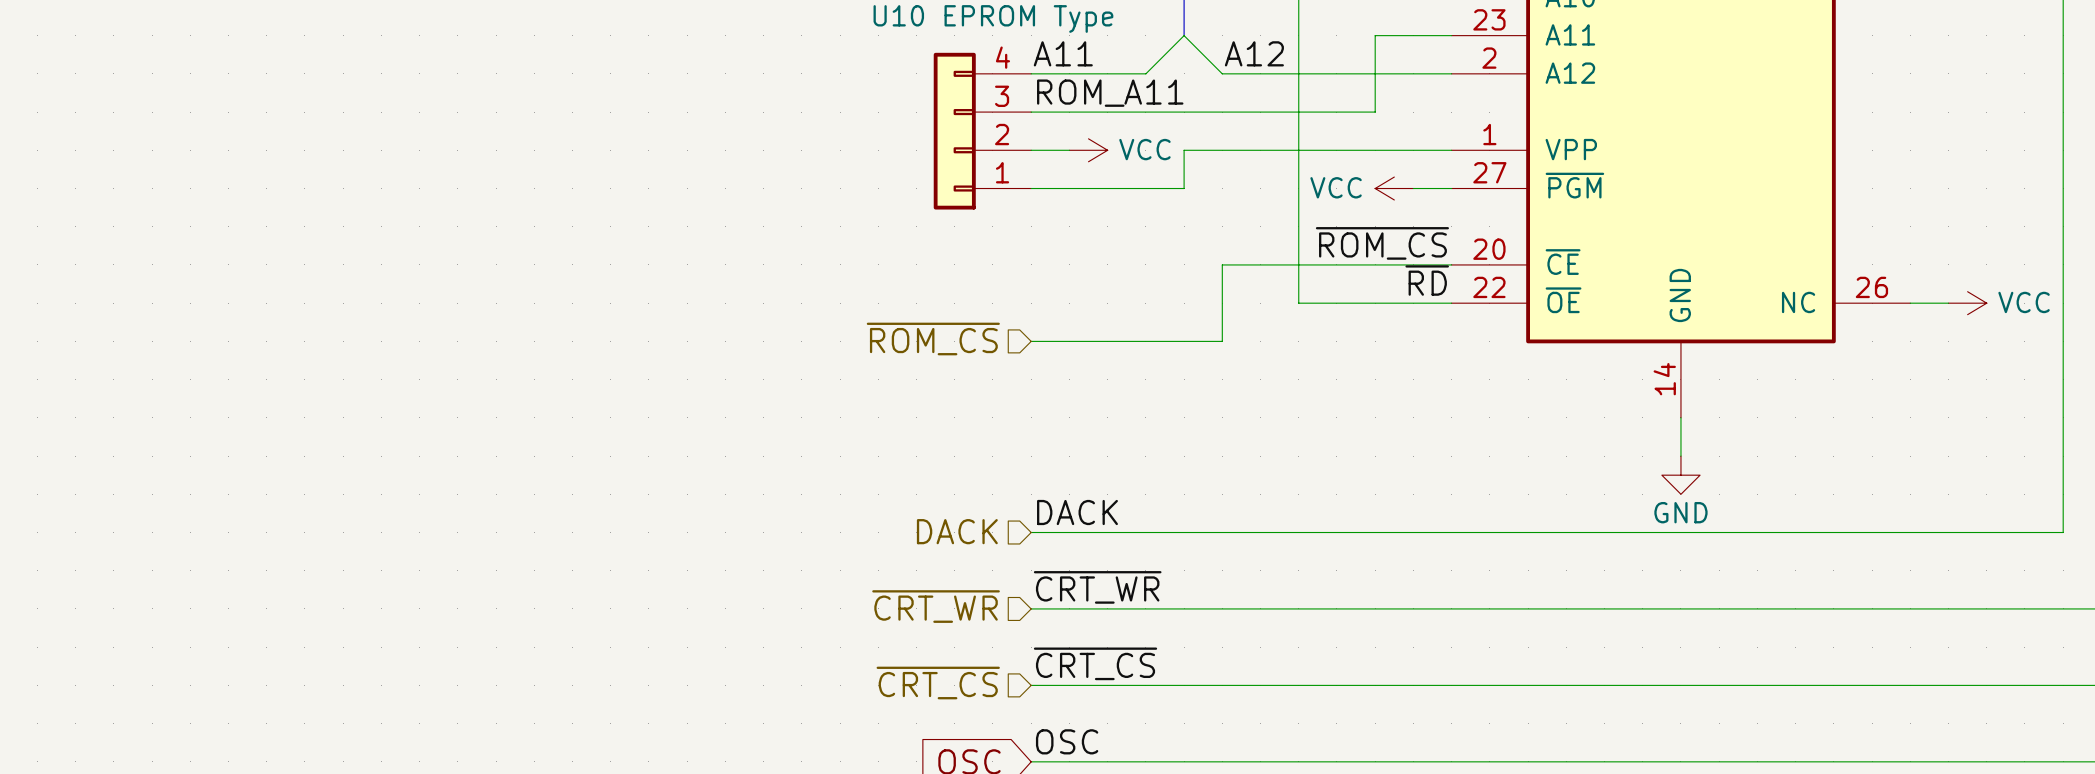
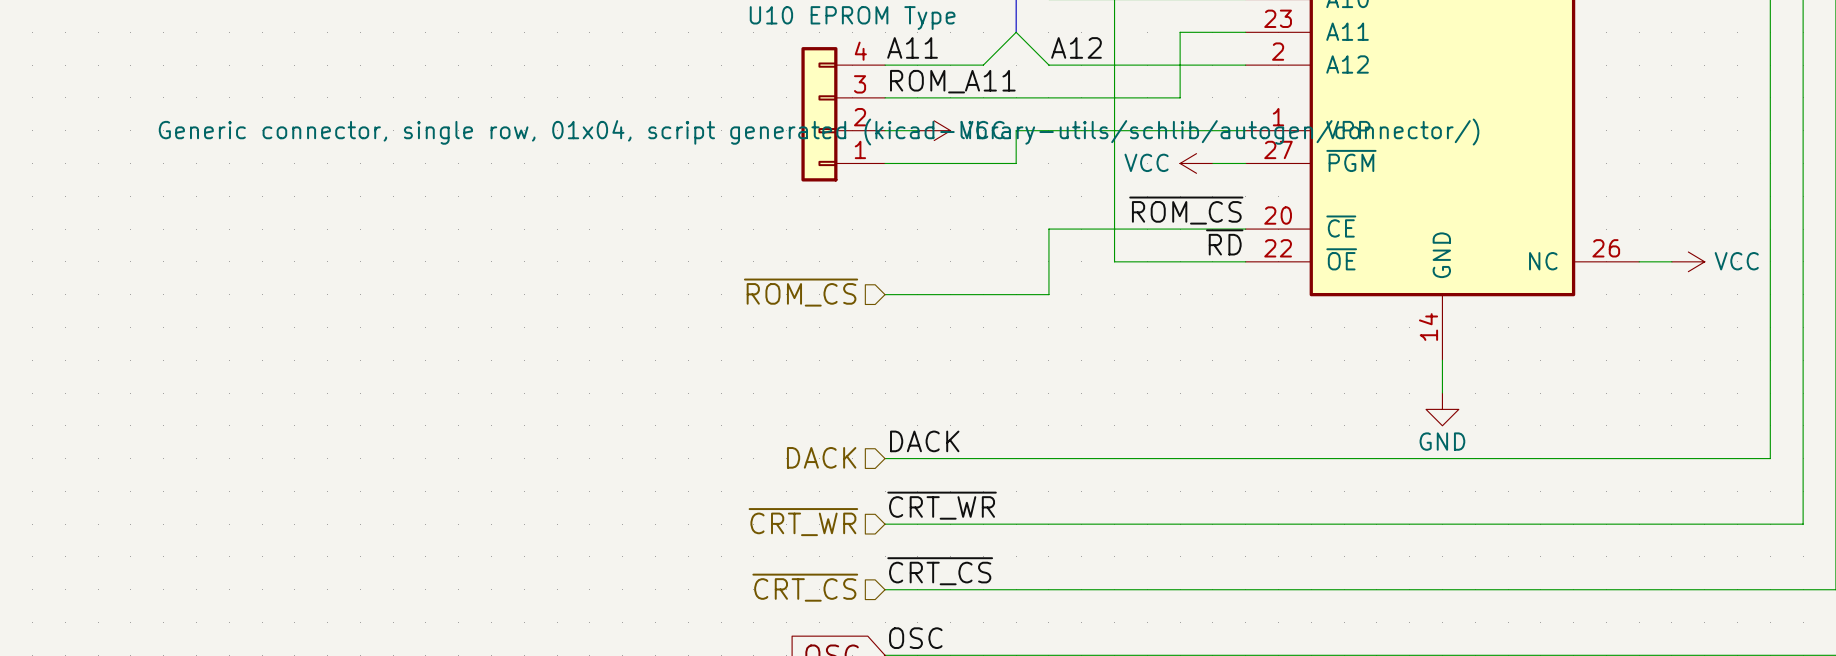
part text: none -> Generic connector, single row, 01x04, script generated (kicad-library-utils/schlib/autogen/connector/) (819, 132)

